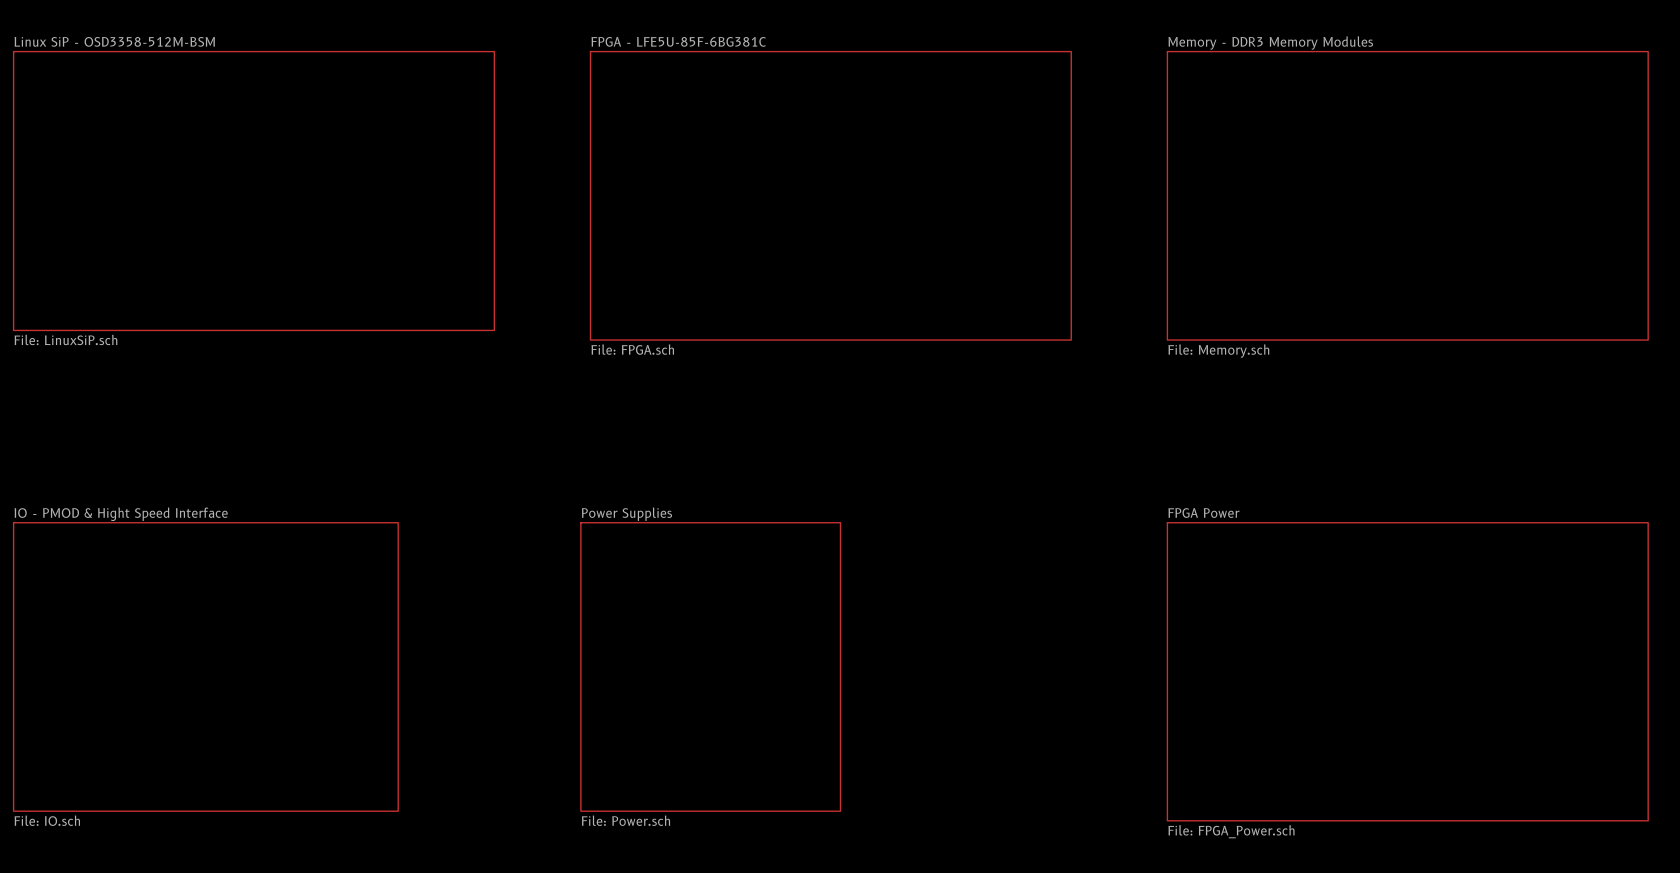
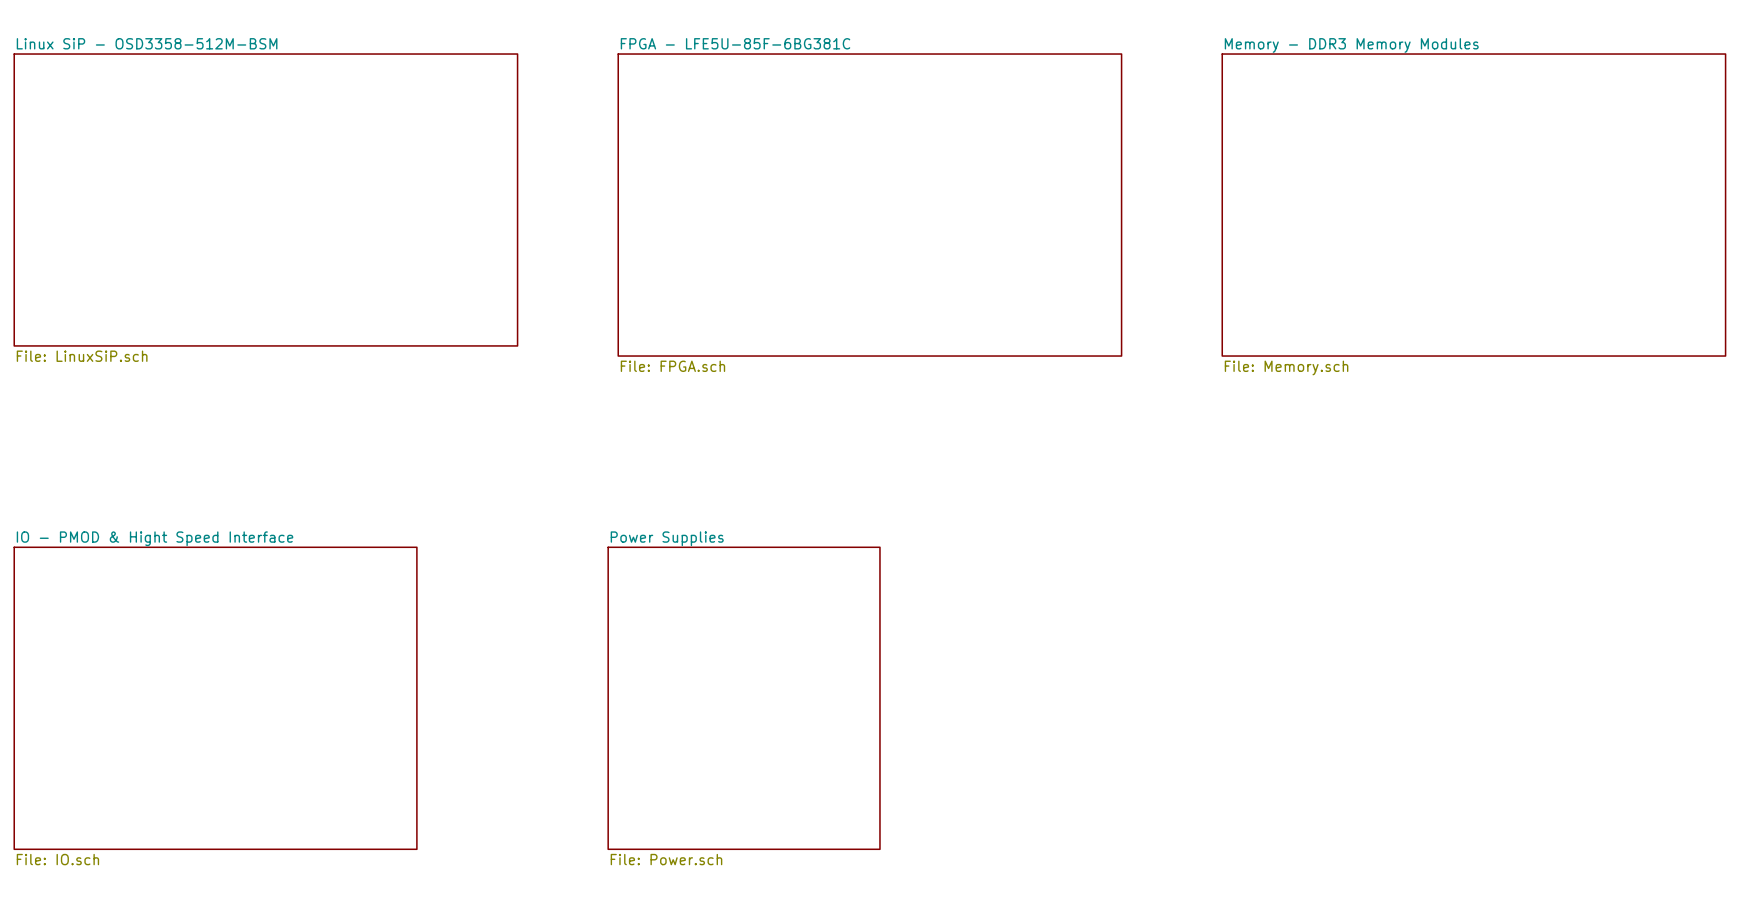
sheet FPGA Power: File: FPGA_Power.sch (1407, 671) -> none

